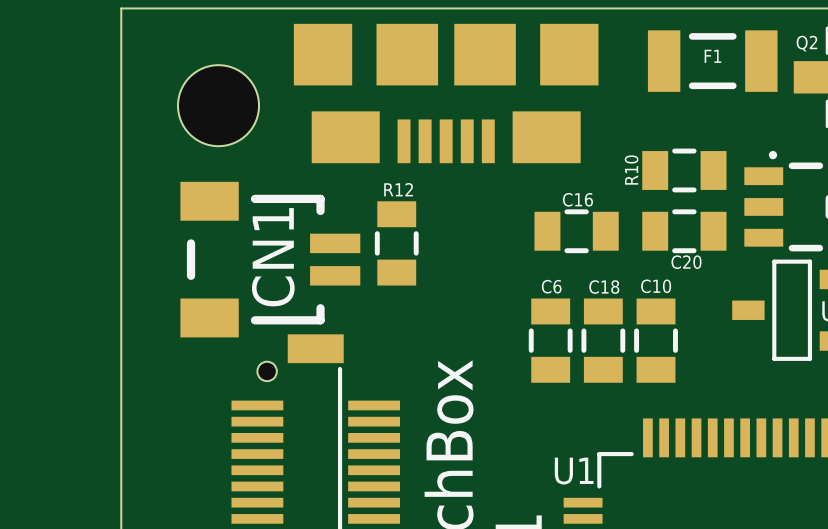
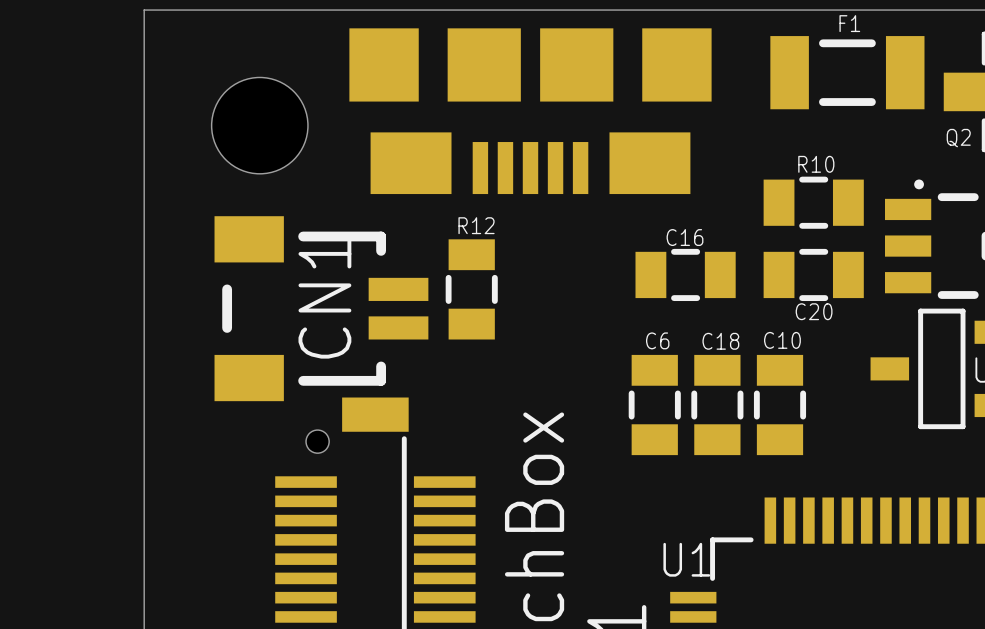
Q2 name position: Q2 (806, 43) -> Q2 (958, 138)
F1 name position: F1 (712, 56) -> F1 (849, 23)
R10 name rotation: 0° (631, 170) -> 90° clockwise (816, 164)
R10 name position: R10 (631, 170) -> R10 (816, 164)

